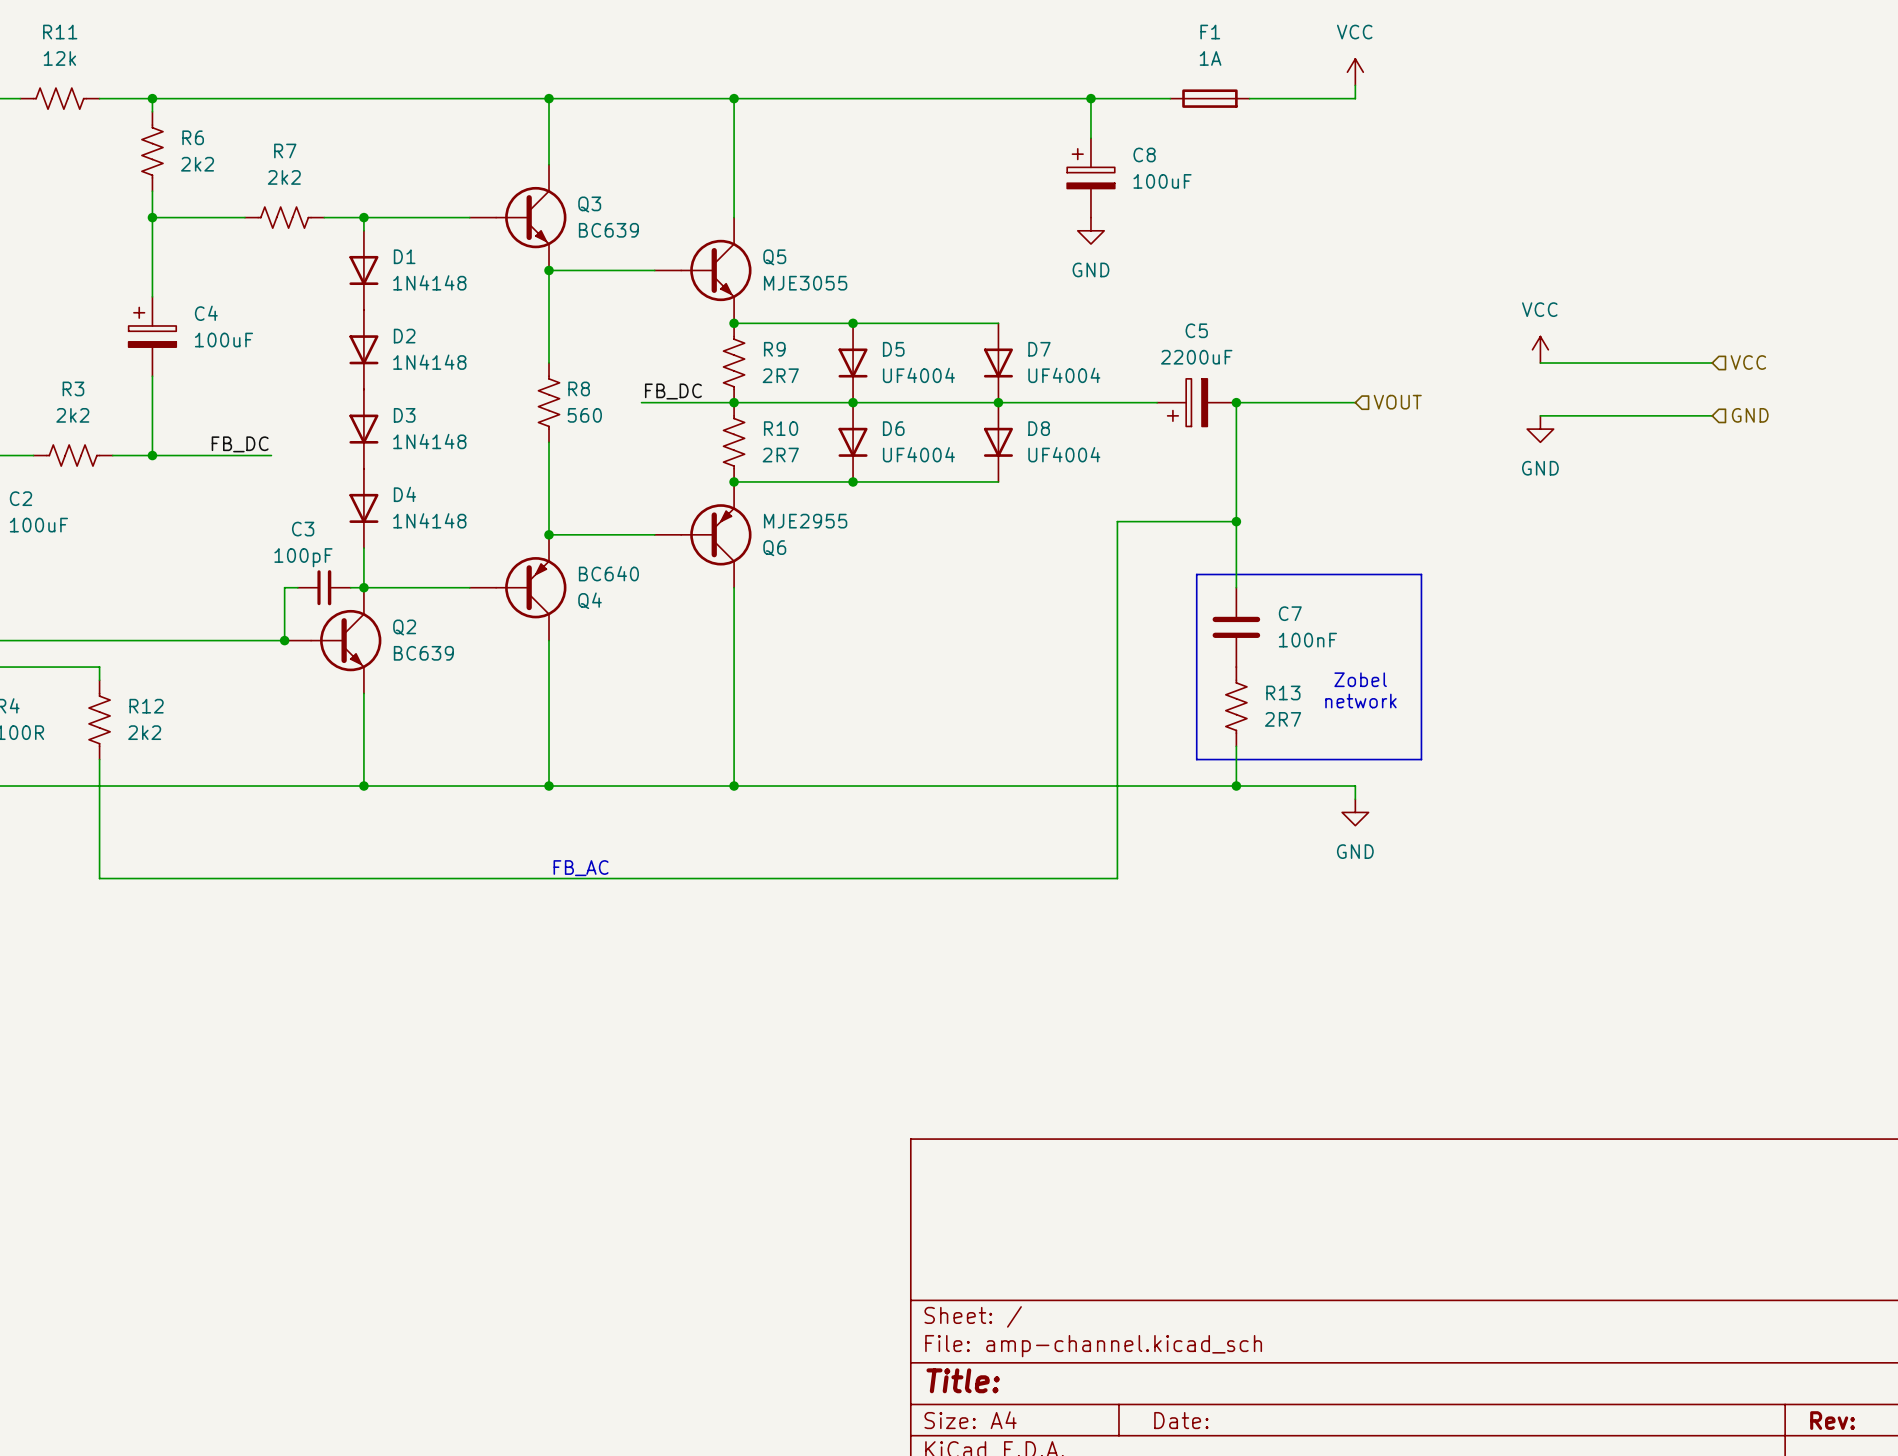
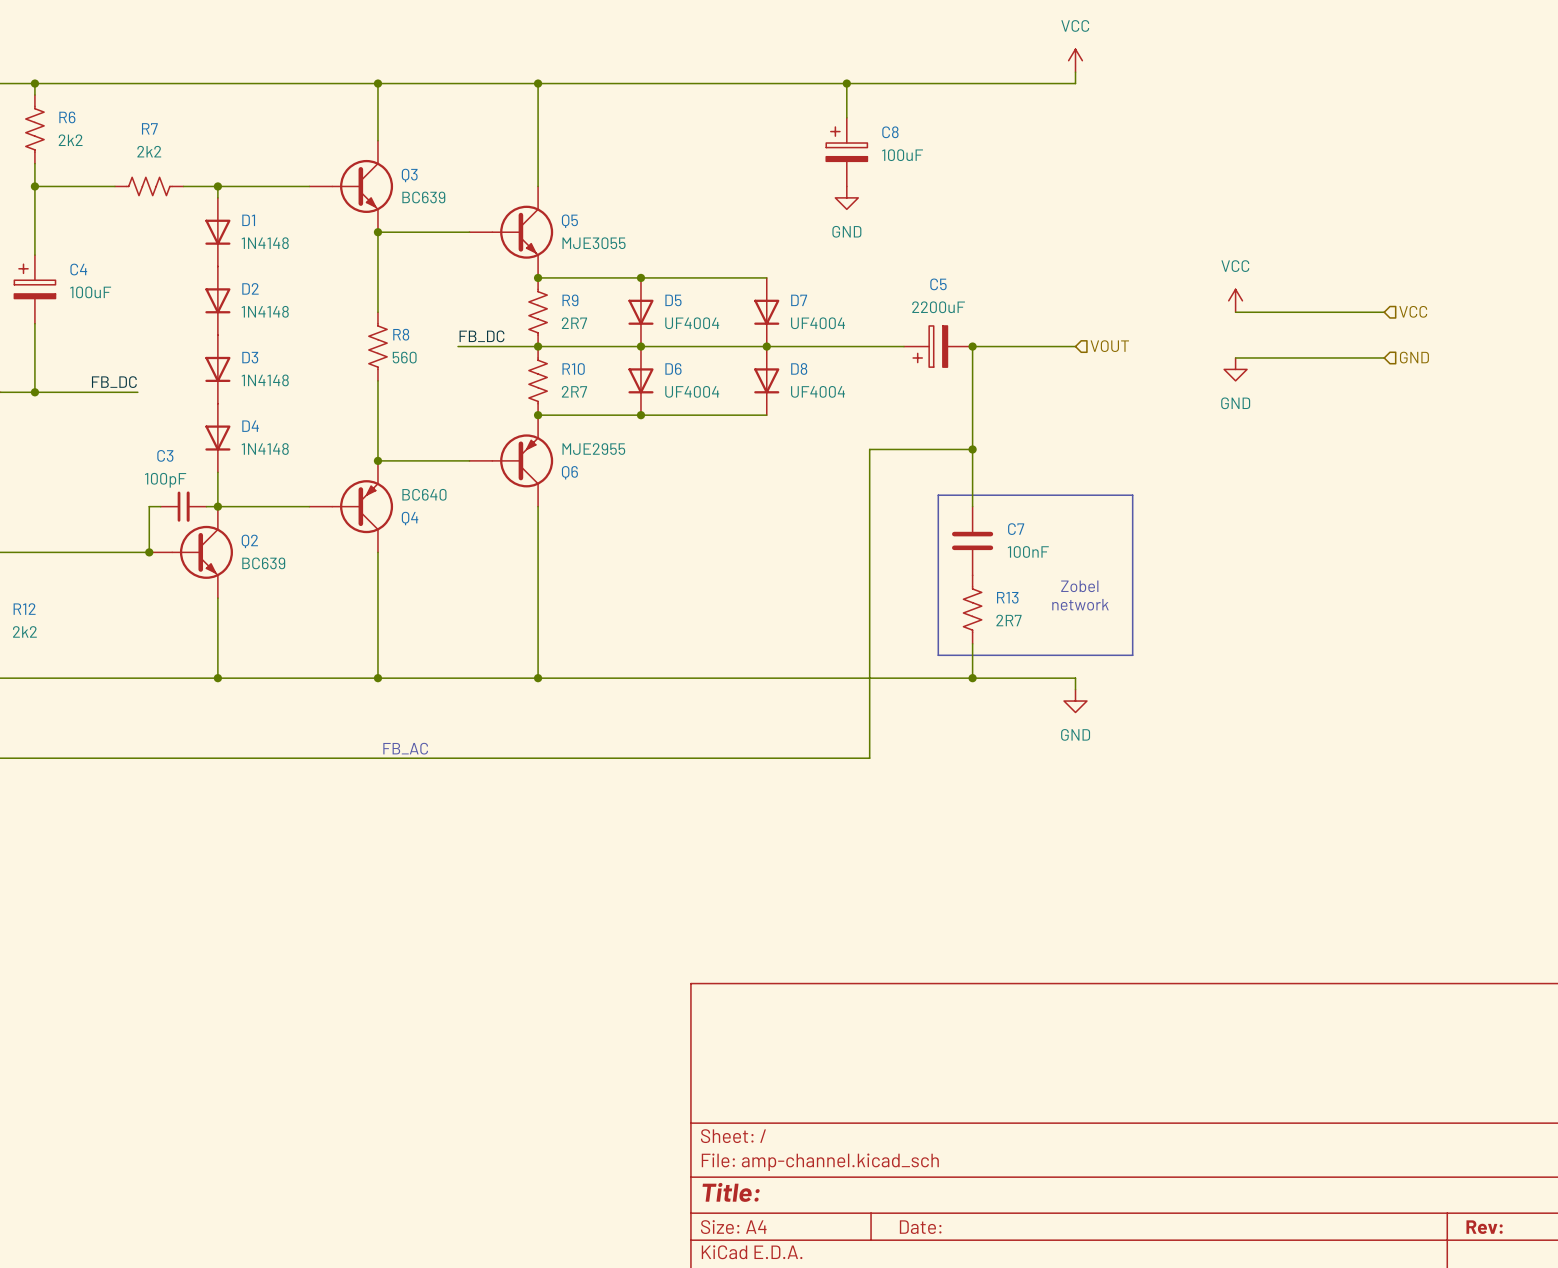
F1: 1A (1209, 98) -> none

